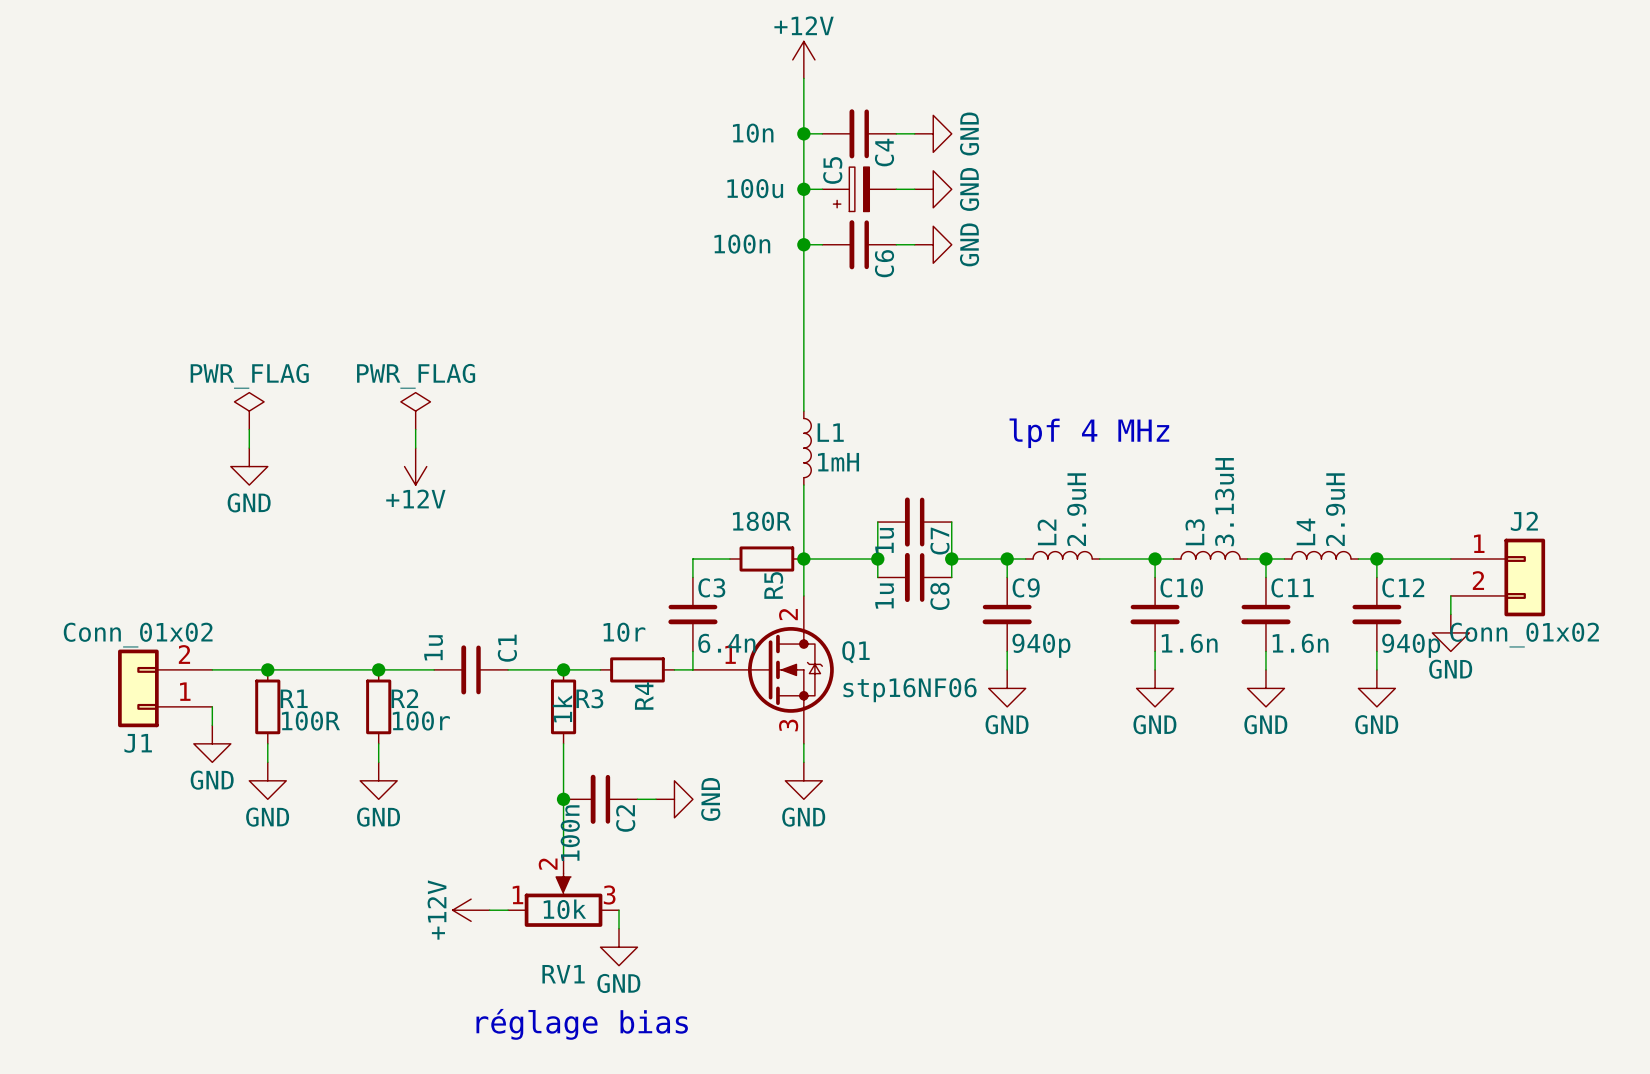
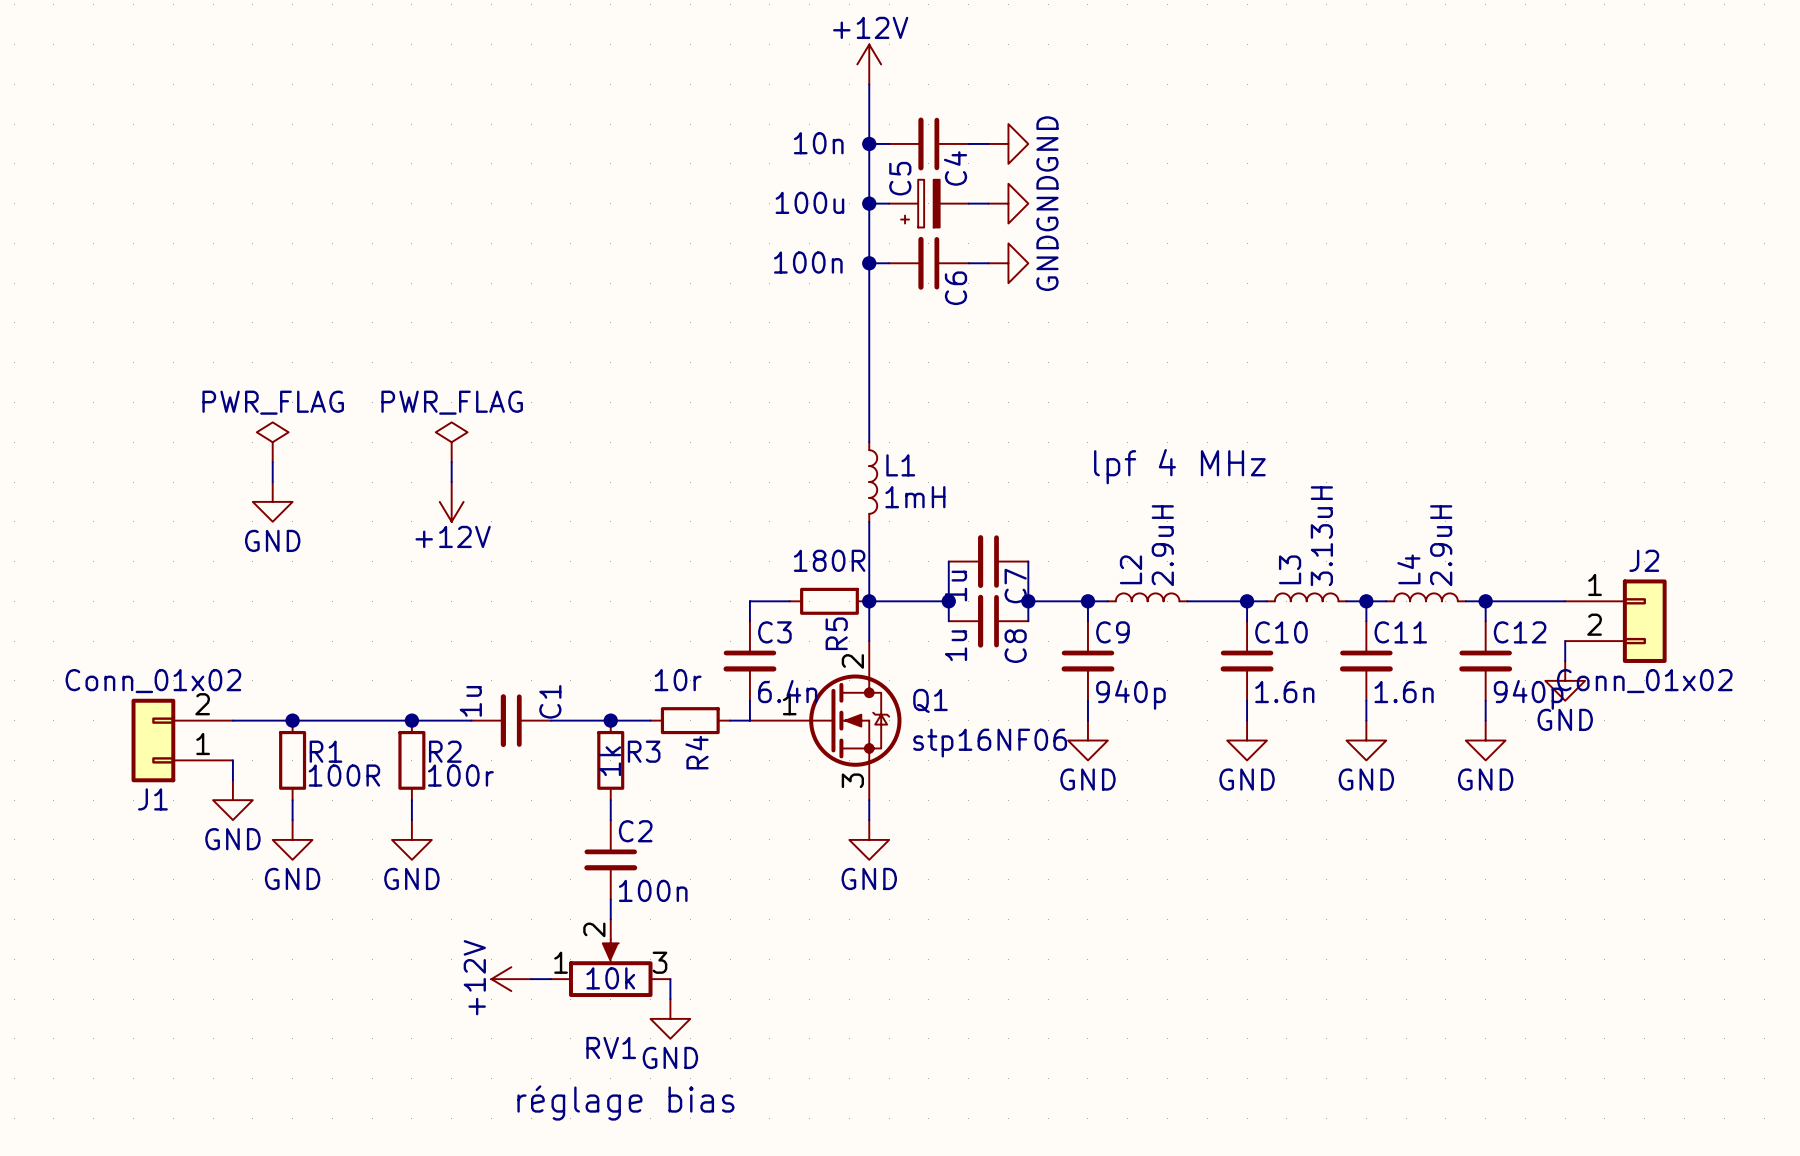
junction: (563, 799) -> none
C2 rotation: 0° (600, 799) -> 90° counterclockwise (610, 859)
wire: (637, 799) (655, 799) -> none
power symbol: GND (674, 799) -> none

